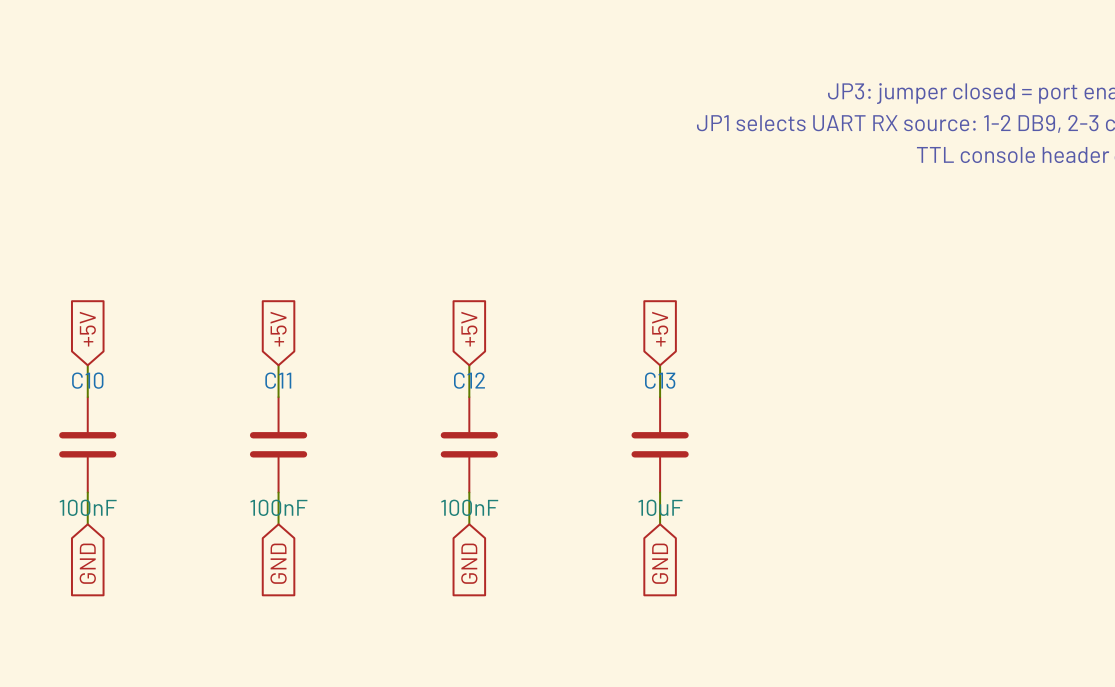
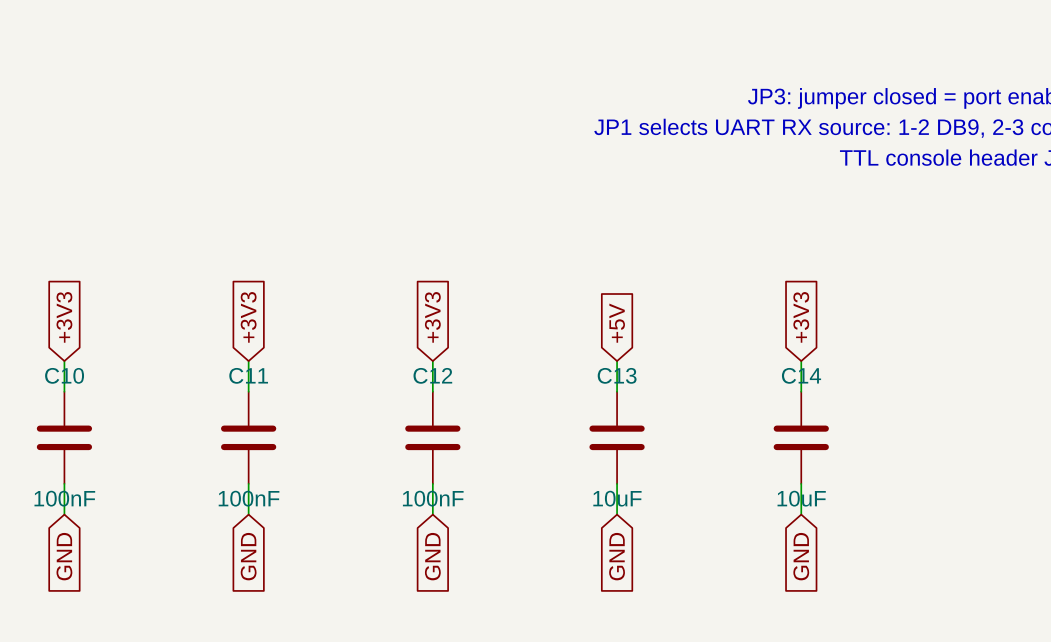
global label: none -> +3V3 (801, 317)
global label: +5V (87, 329) -> +3V3 (64, 317)
global label: +5V (278, 329) -> +3V3 (248, 317)
global label: +5V (469, 329) -> +3V3 (432, 317)
wire: none -> (801, 361) (801, 391)
C14: none -> 10uF (801, 437)
wire: none -> (801, 483) (801, 514)
global label: none -> GND (801, 556)

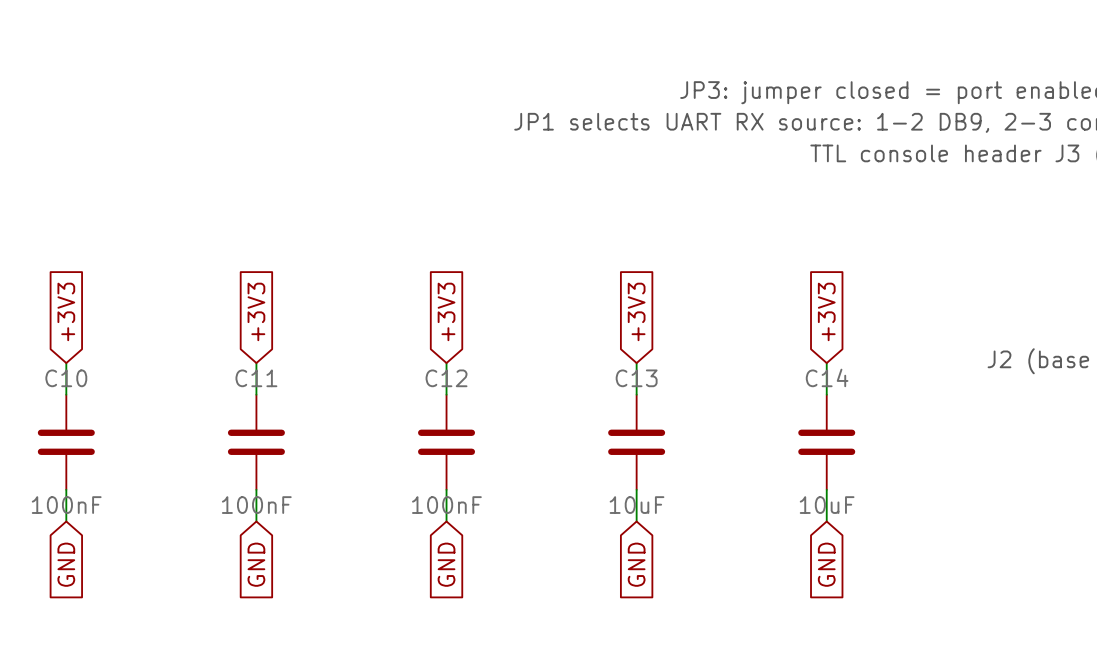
global label: +5V (617, 323) -> +3V3 (636, 311)

